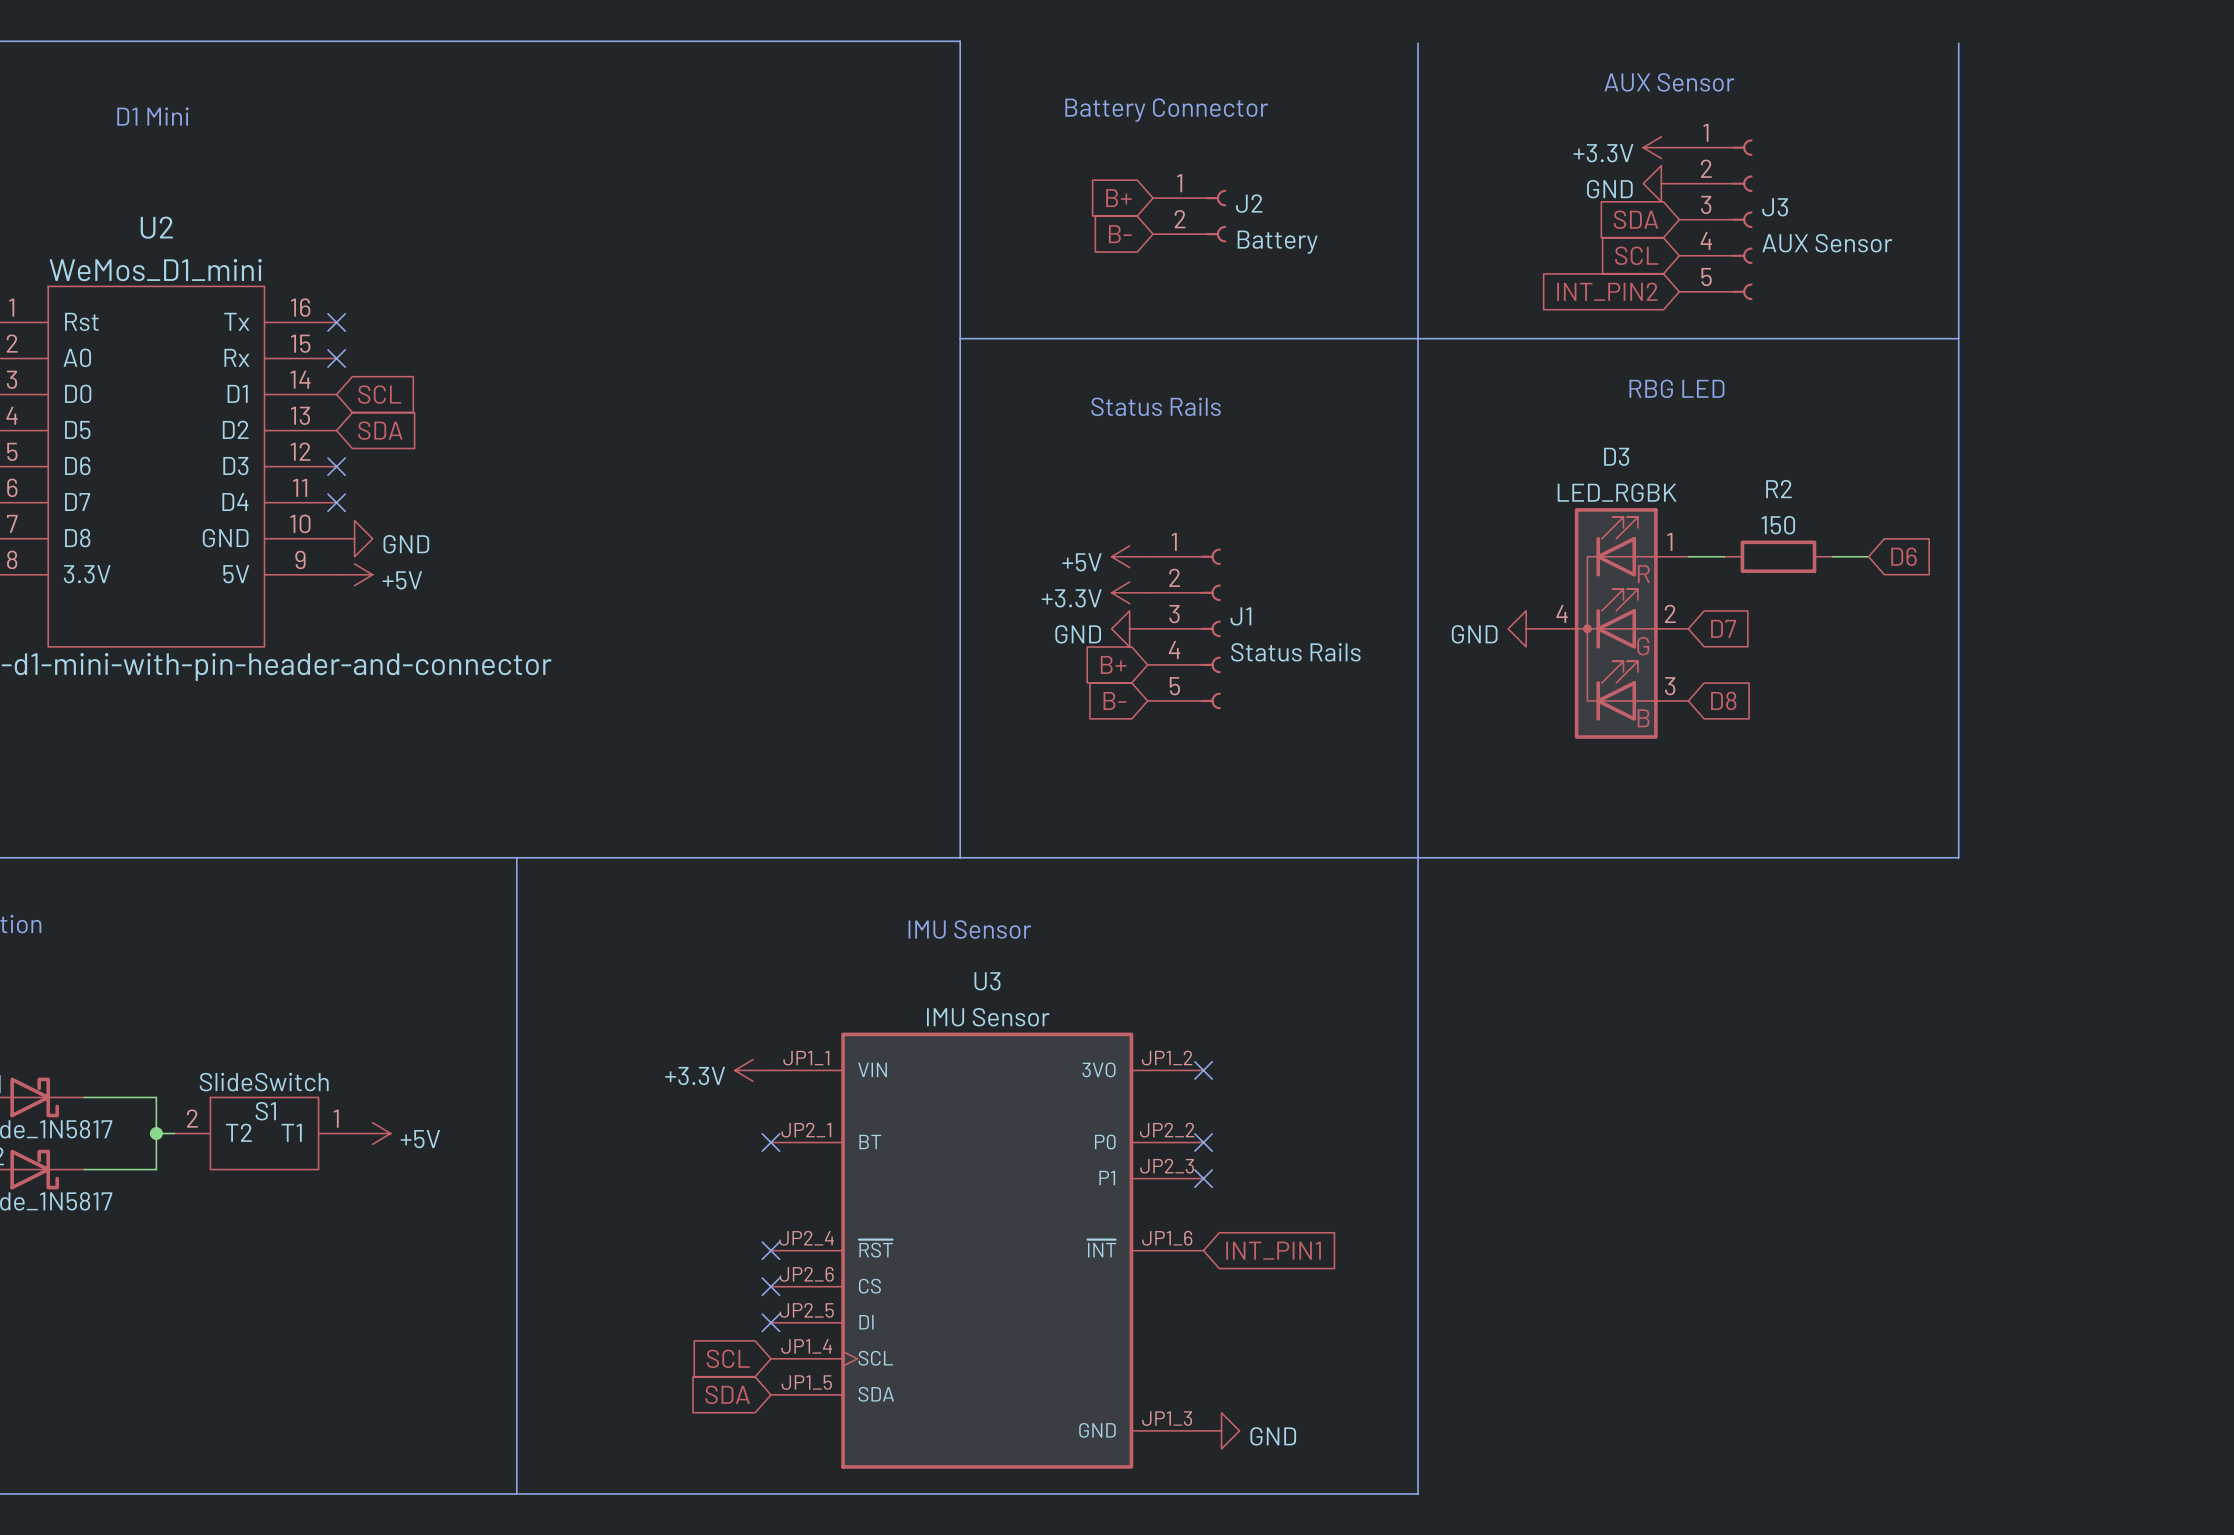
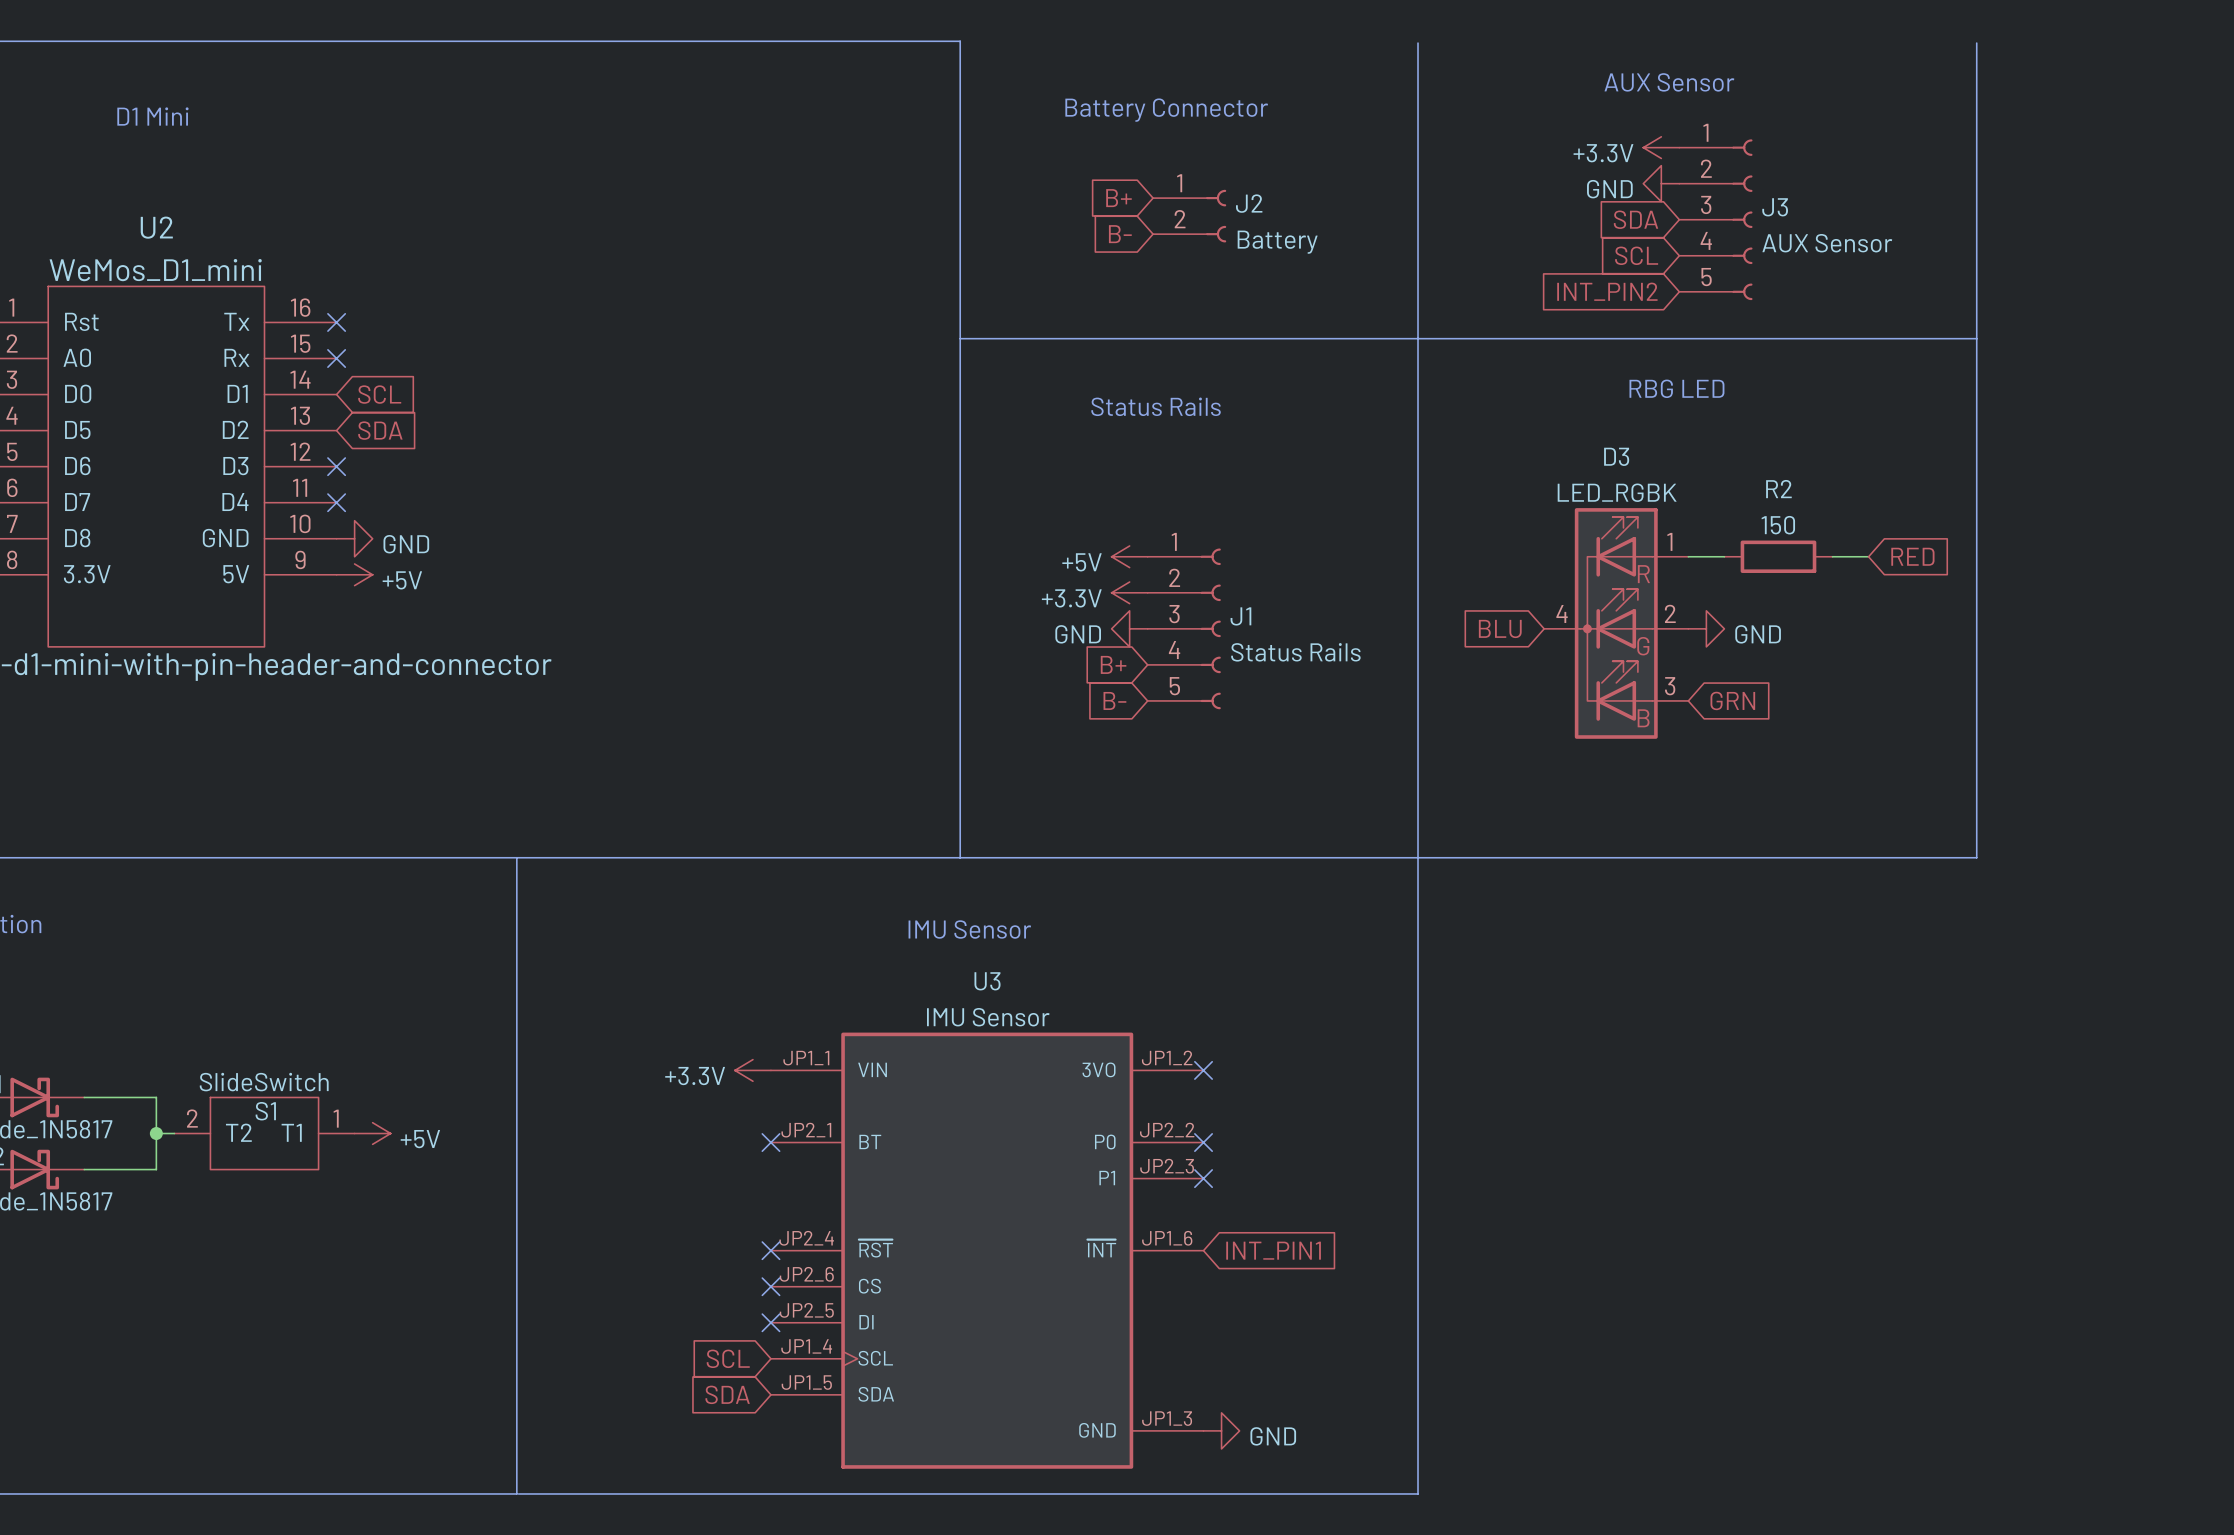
line: (1958, 43) (1958, 338) -> (1976, 338) (1958, 338)
line: (1958, 340) (1958, 857) -> (1976, 43) (1976, 857) (1958, 857)
global label: D6 (1904, 556) -> RED (1912, 556)
global label: none -> BLU (1500, 628)
power symbol rotation: 0° (1526, 628) -> 180° (1706, 628)
power symbol position: GND (1526, 628) -> GND (1706, 628)
global label: D7 (1723, 628) -> none
global label: D8 (1723, 700) -> GRN (1732, 700)

